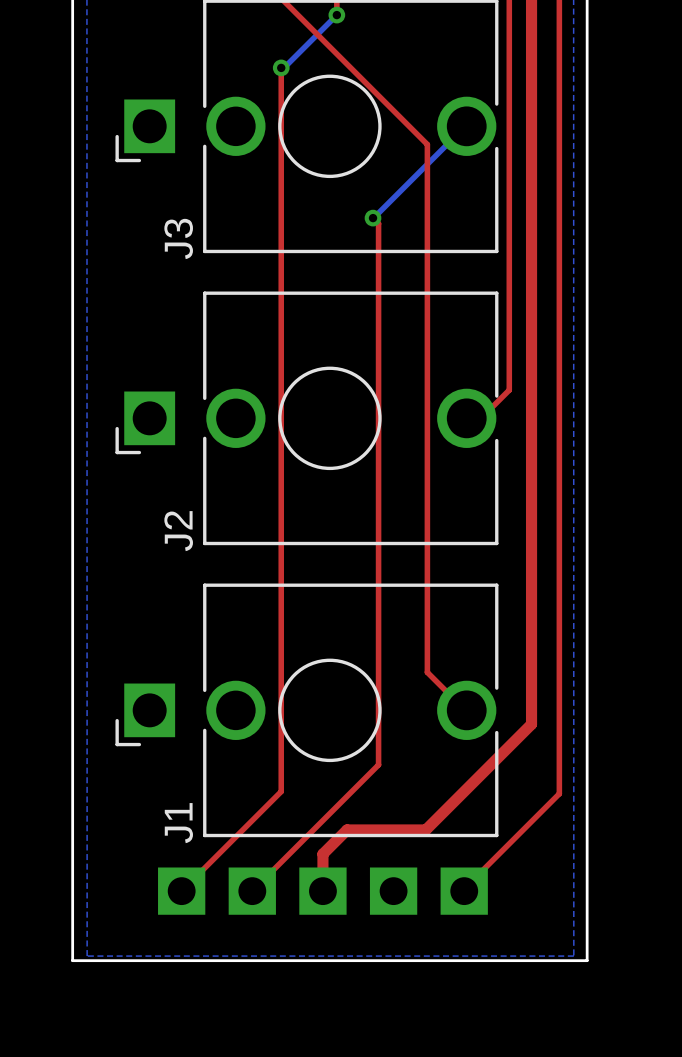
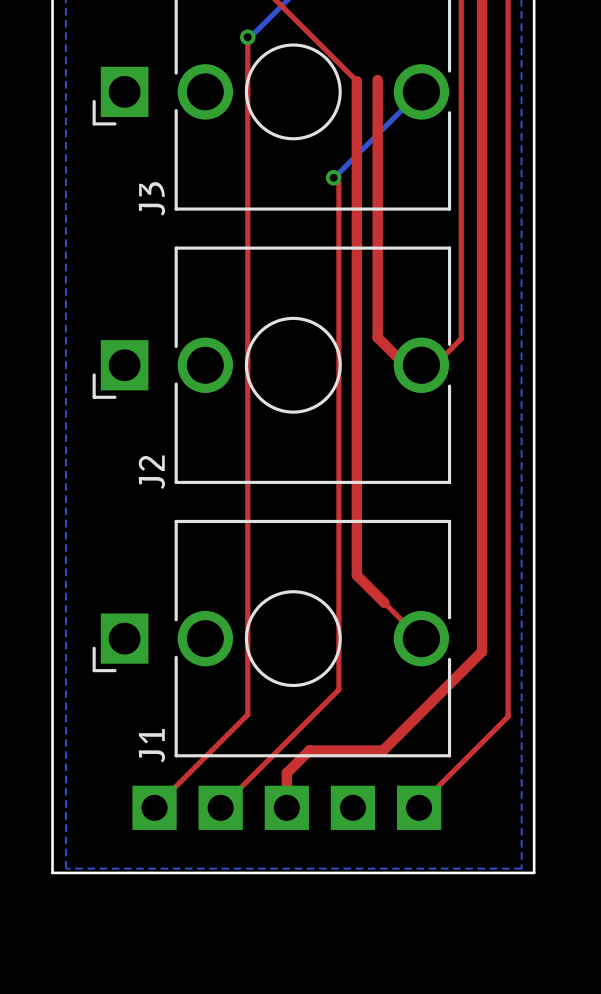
top track: none -> (377, 79) (377, 337) (420, 379)
top track: (397, 114) (427, 144) (427, 672) -> (356, 81) (356, 575) (384, 603)

